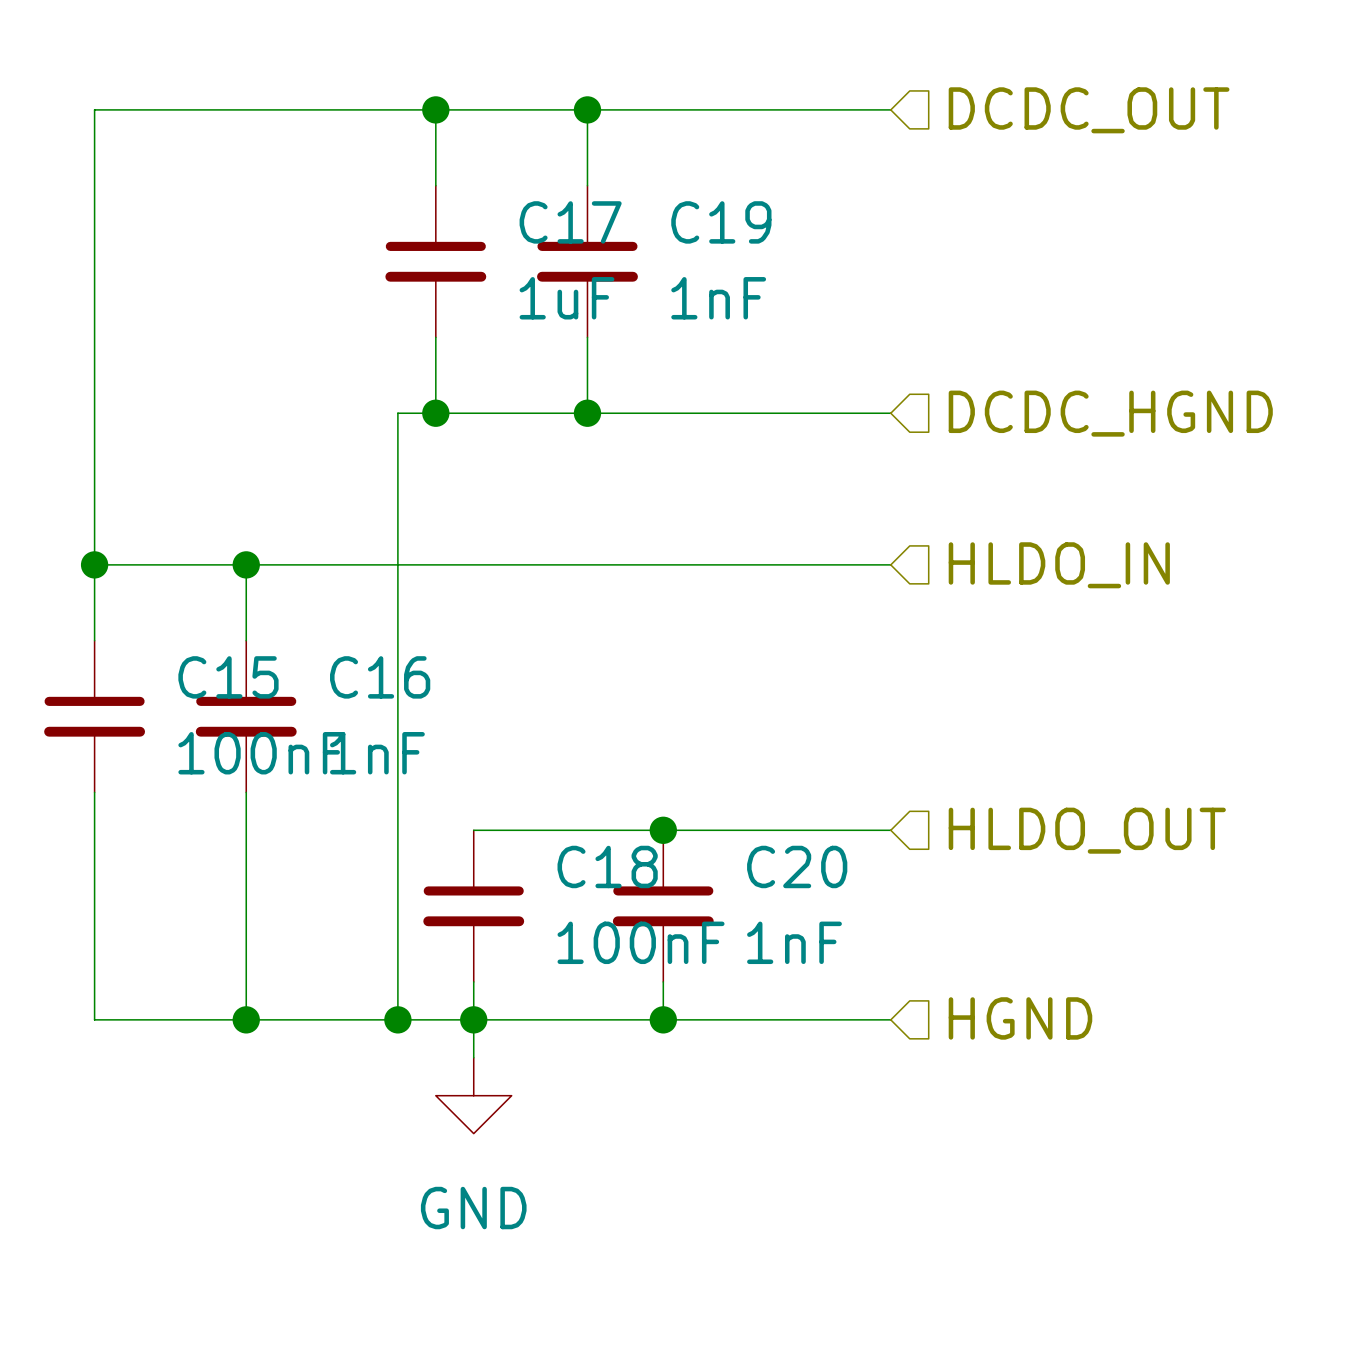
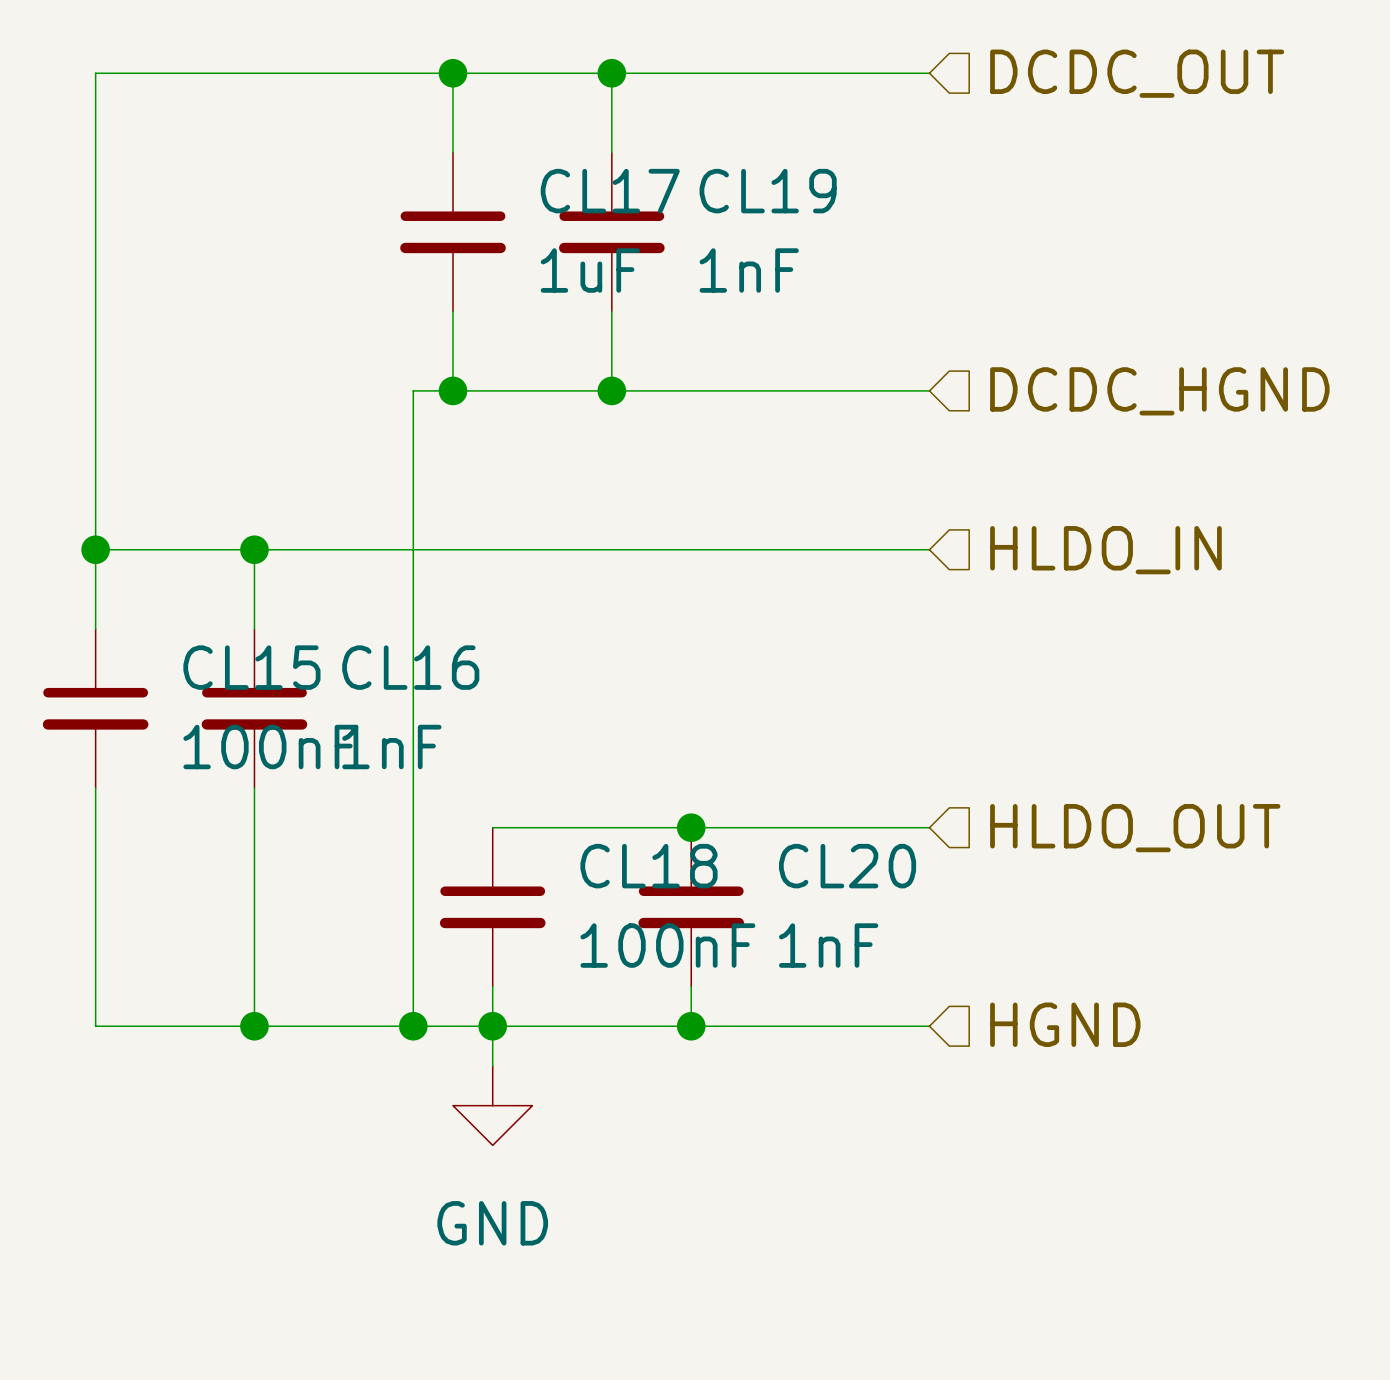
C17 name: C17 (570, 222) -> CL17 (610, 191)
C19 name: C19 (721, 222) -> CL19 (768, 191)
C15 name: C15 (228, 677) -> CL15 (251, 667)
C16 name: C16 (380, 677) -> CL16 (410, 667)
C18 name: C18 (607, 866) -> CL18 (649, 866)
C20 name: C20 (797, 866) -> CL20 (847, 866)

